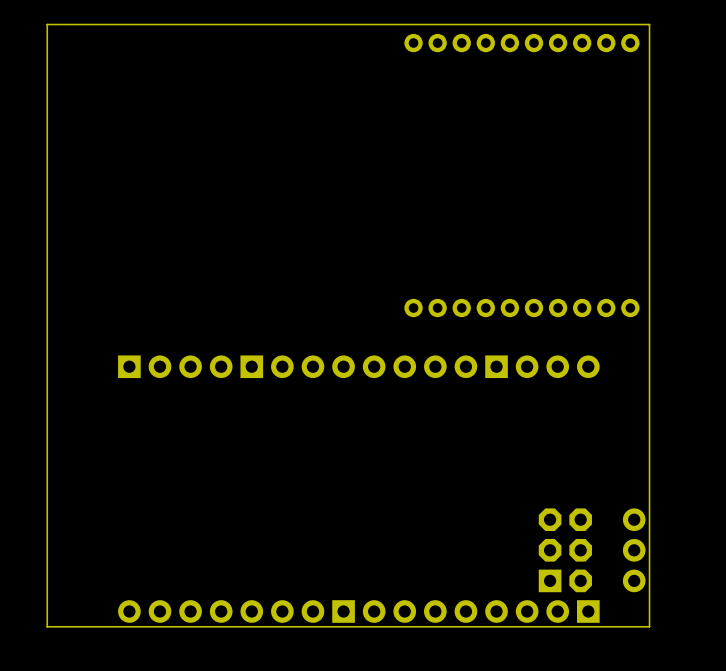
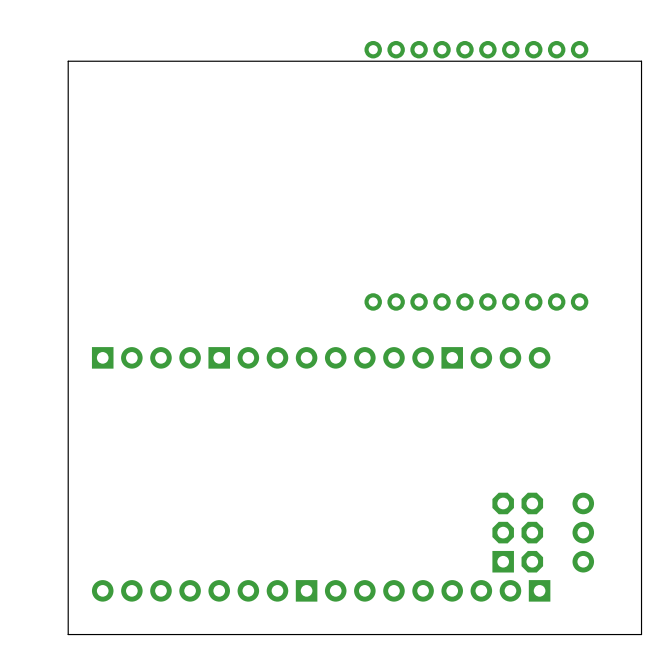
board edge: (649, 24) (47, 24) (47, 626) (649, 626) (649, 24) -> (641, 61) (68, 61) (68, 634) (641, 634) (641, 61)

